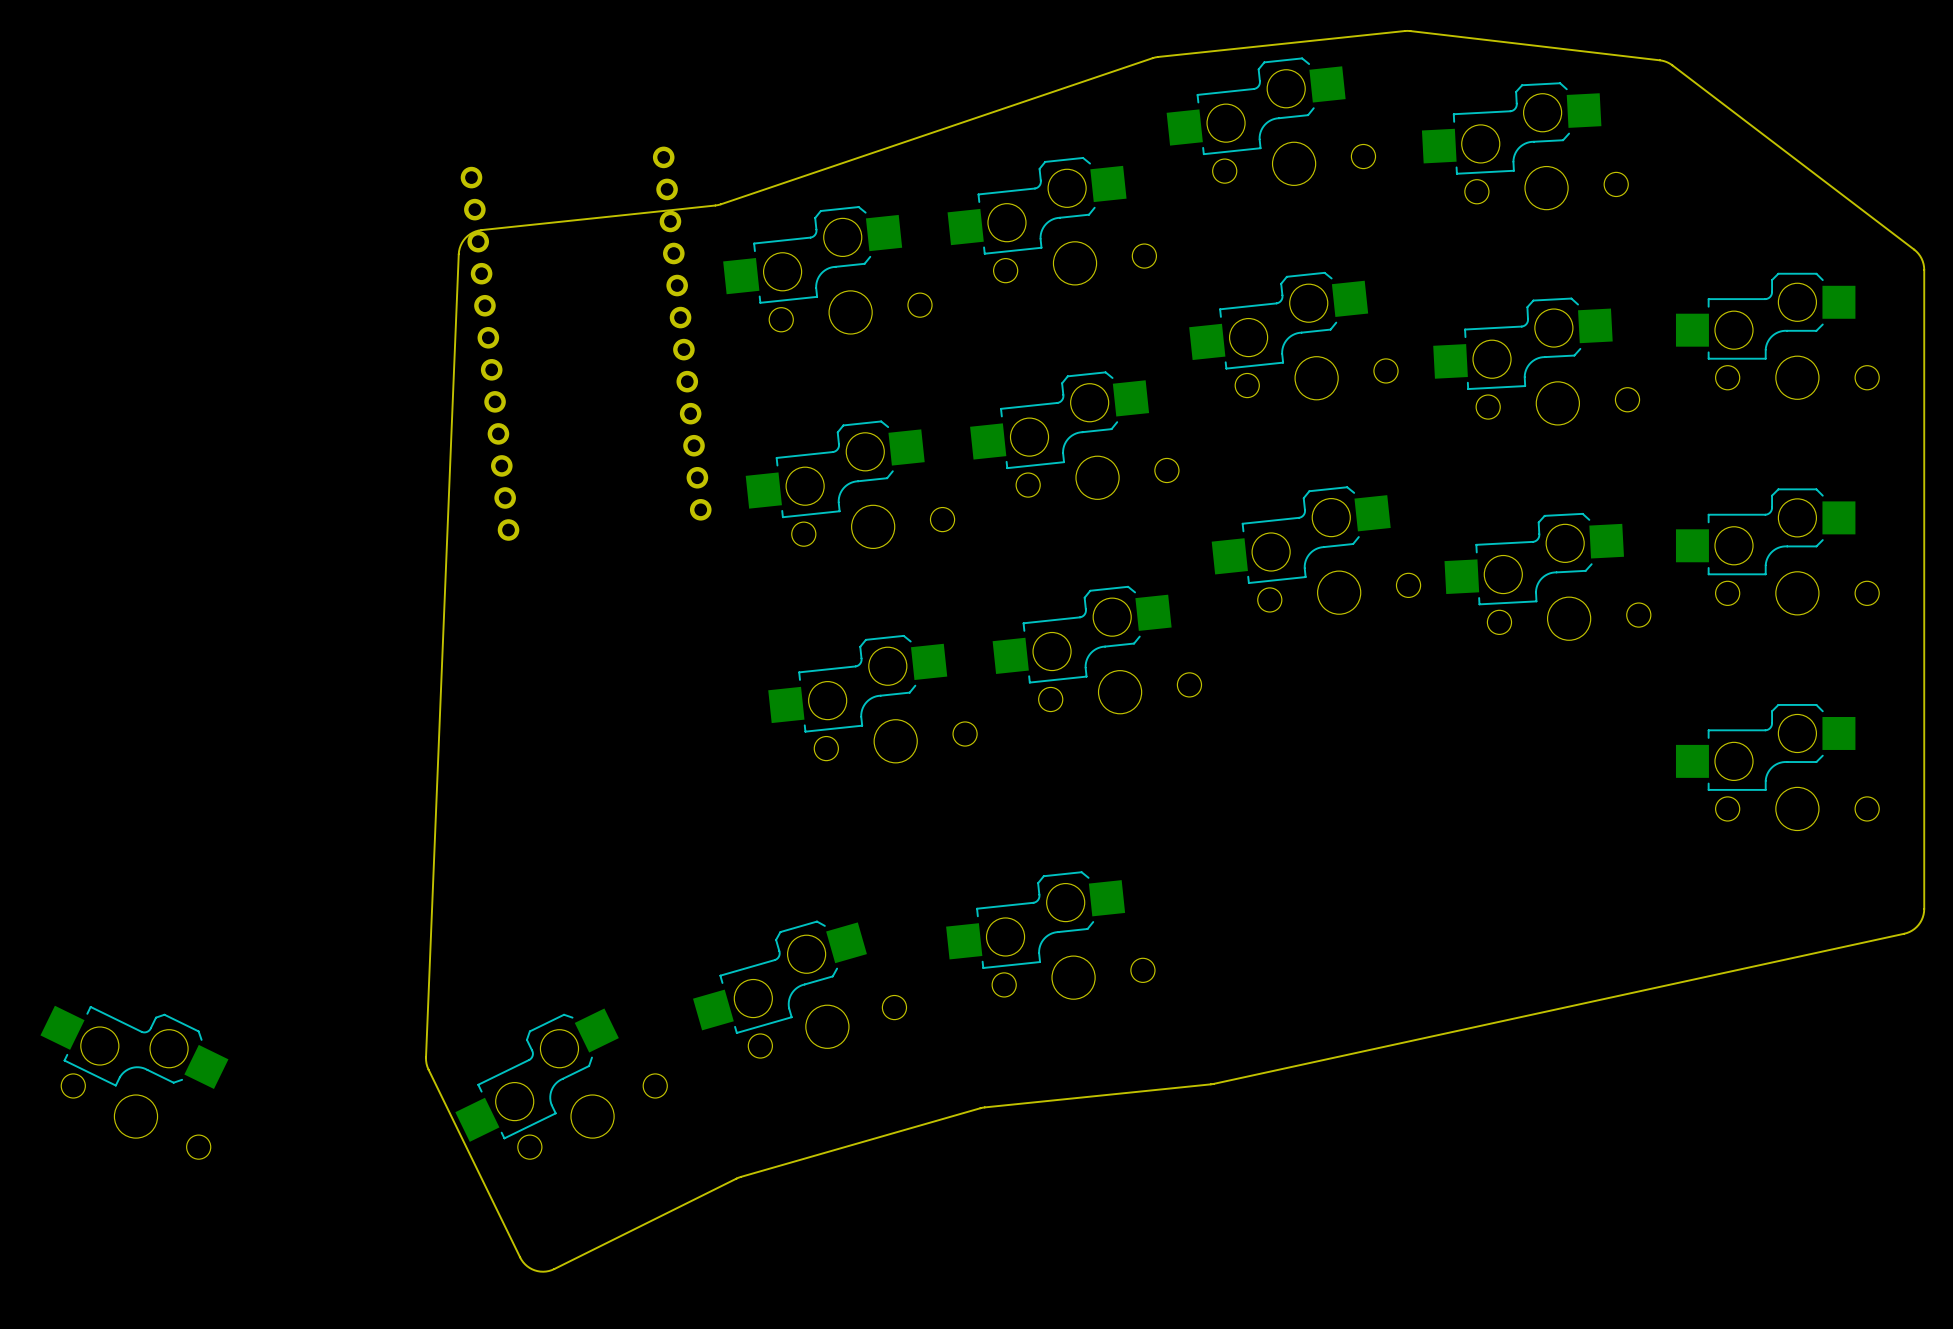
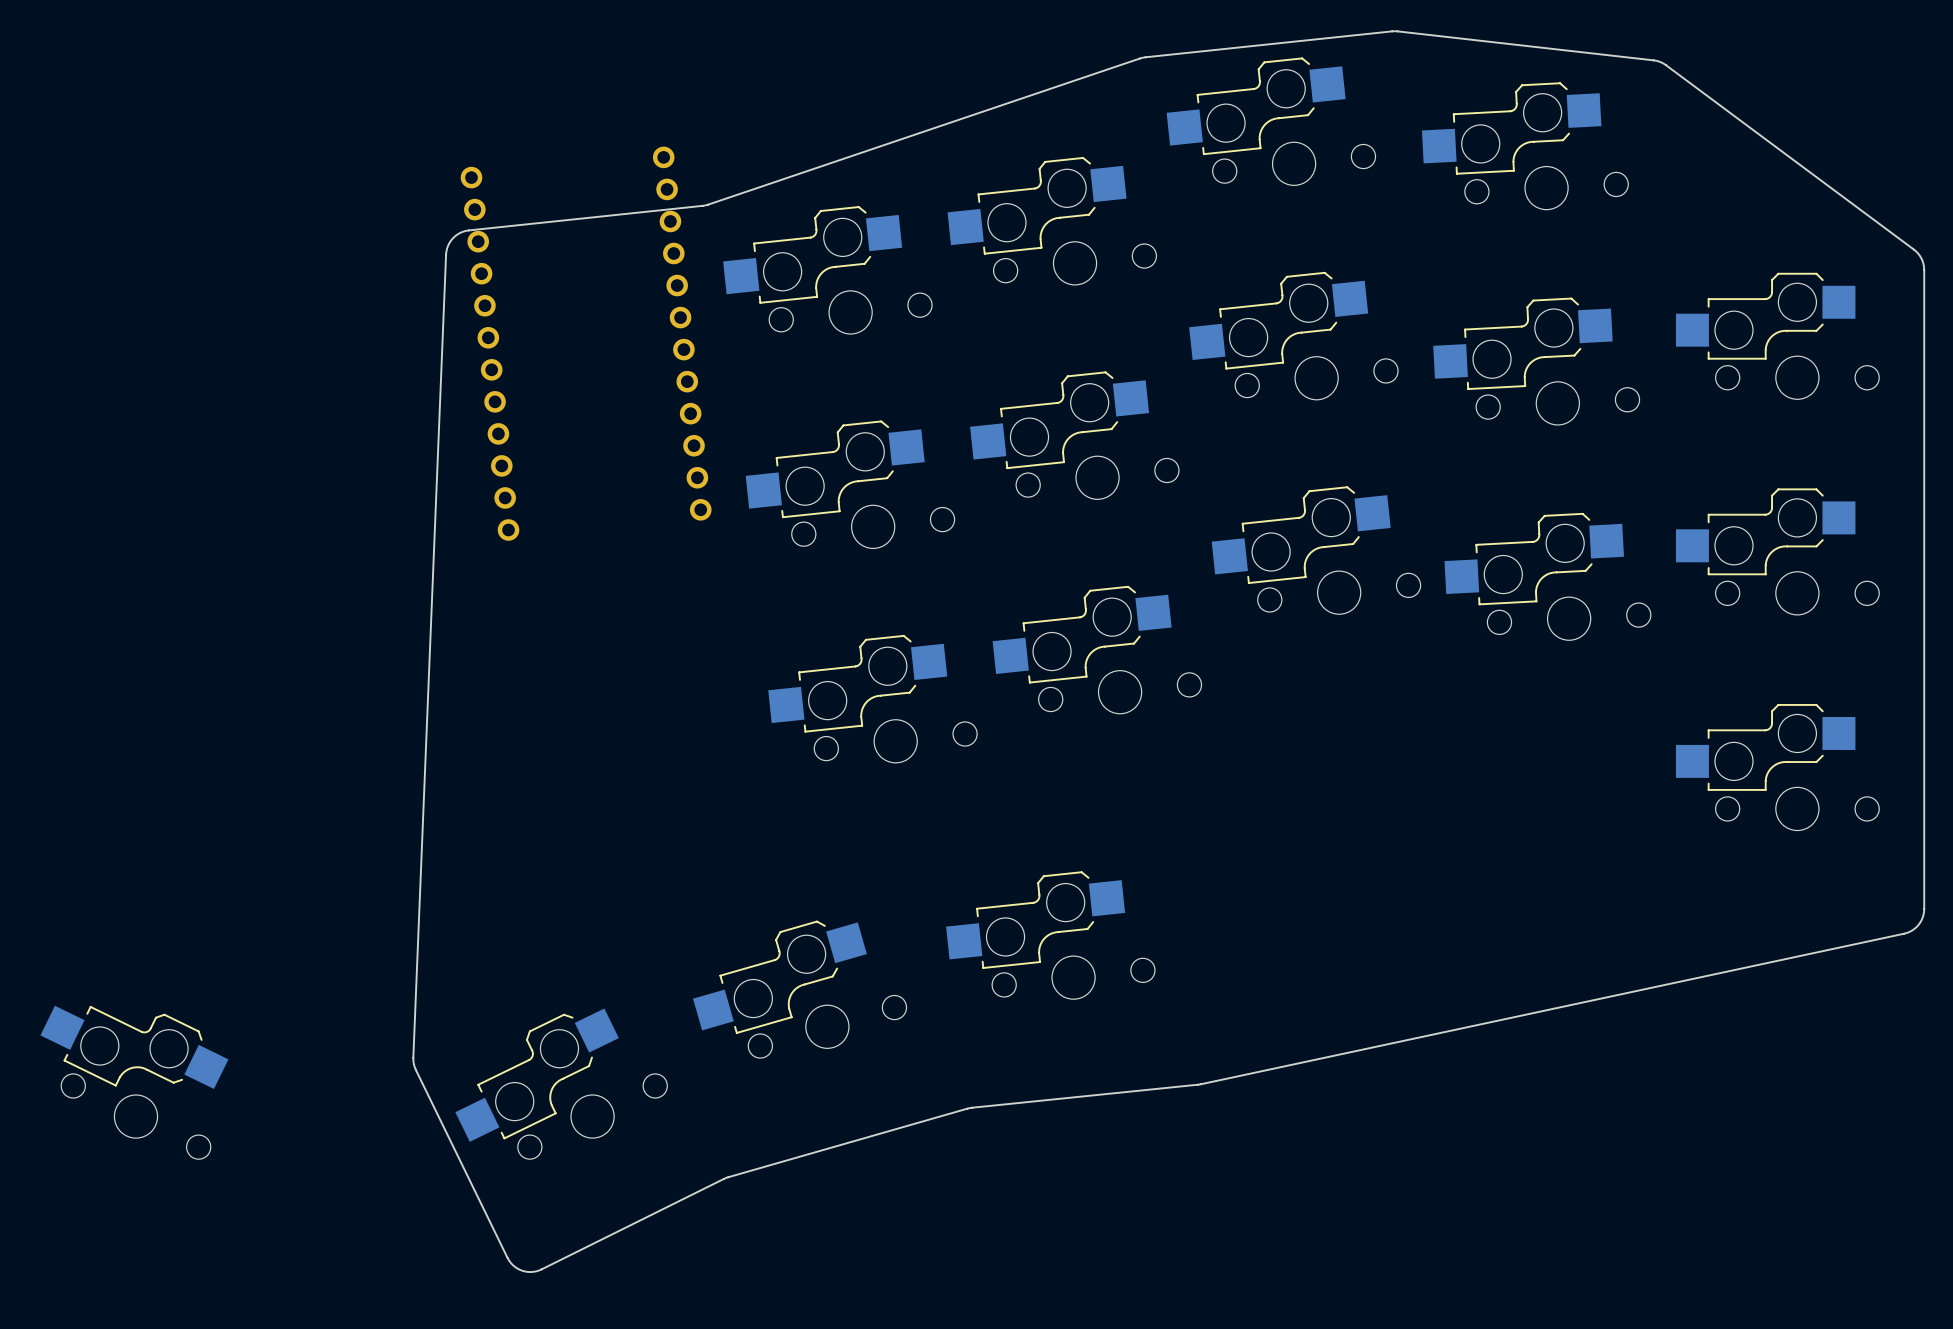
board edge: (1924, 269) (1921, 258) (1914, 249) (1668, 62) (1660, 60) (1407, 30) (1155, 57) (718, 205) (481, 230) (472, 232) (463, 240) (458, 254) (426, 1060) (428, 1069) (521, 1259) (532, 1269) (546, 1271) (738, 1177) (980, 1108) (1213, 1083) (1904, 933) (1918, 924) (1924, 908) -> (1924, 270) (1921, 258) (1914, 249) (1662, 62) (1653, 60) (1394, 31) (1142, 57) (705, 205) (468, 230) (460, 232) (451, 240) (446, 254) (413, 1060) (415, 1069) (508, 1260) (519, 1269) (533, 1271) (726, 1177) (967, 1108) (1200, 1084) (1904, 933) (1918, 924) (1924, 908)

